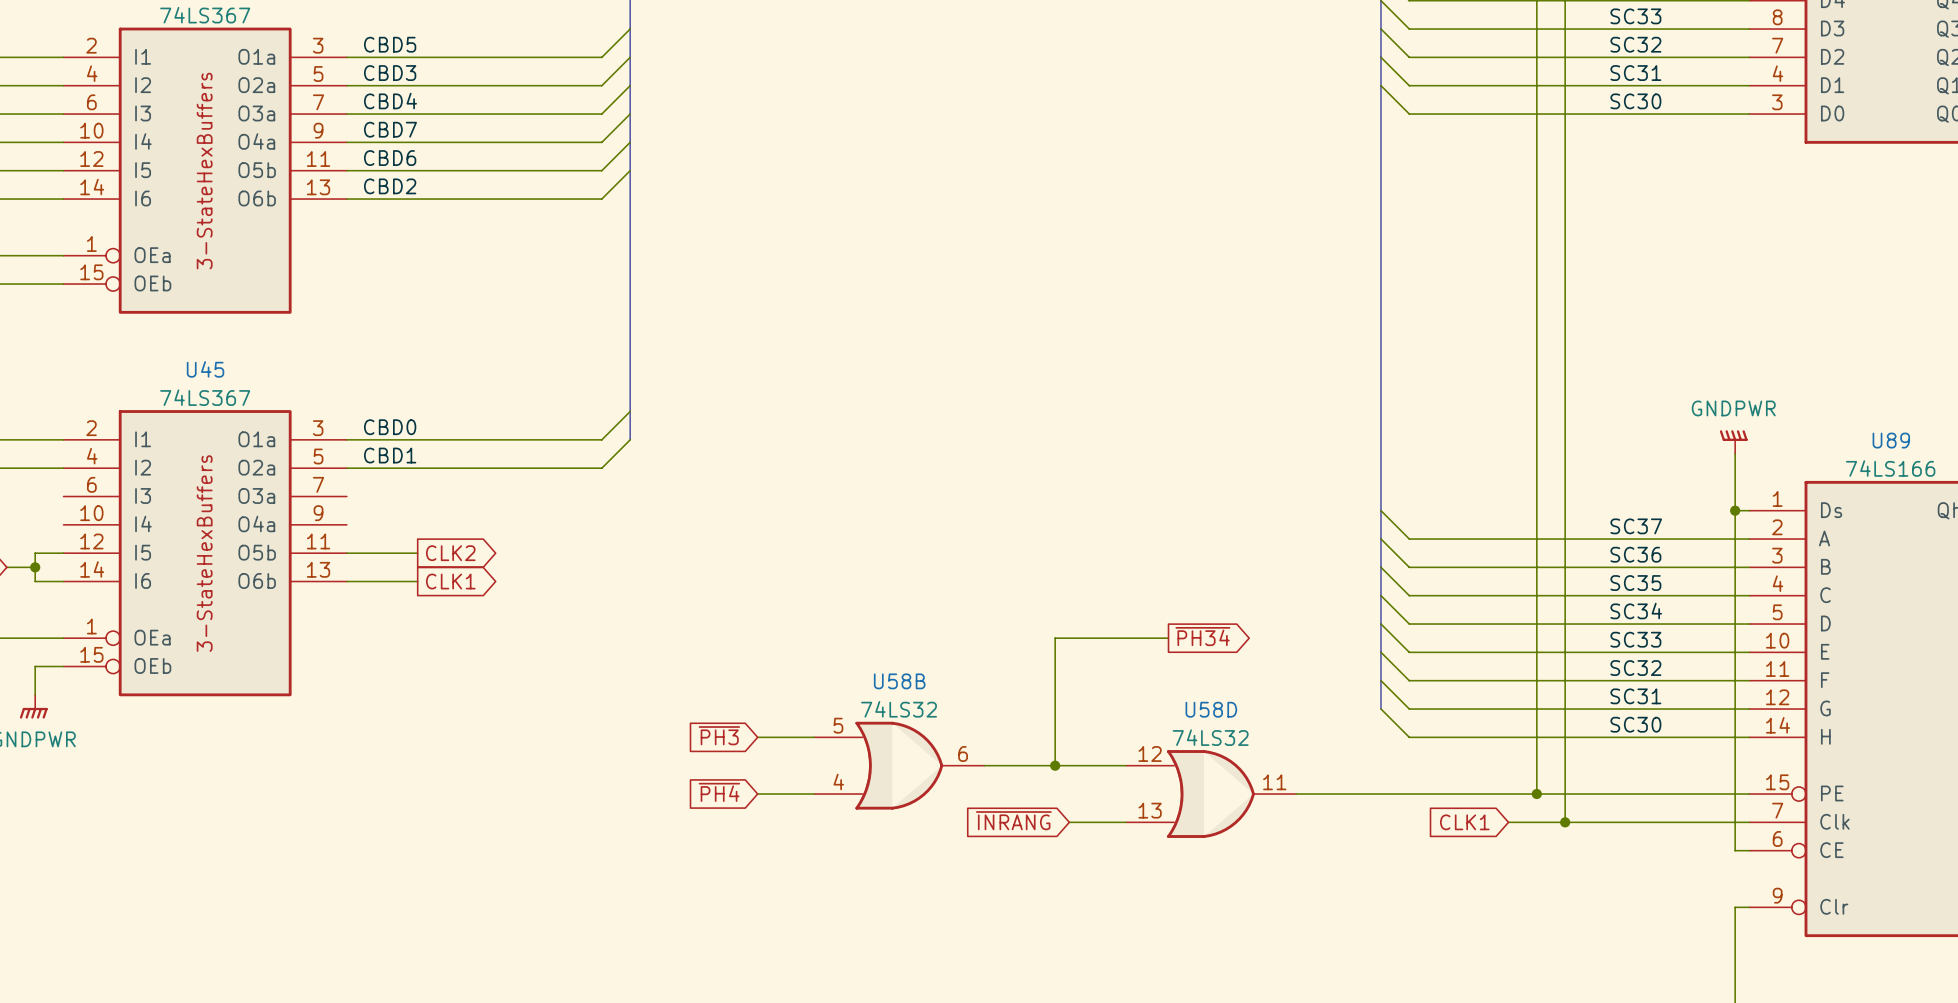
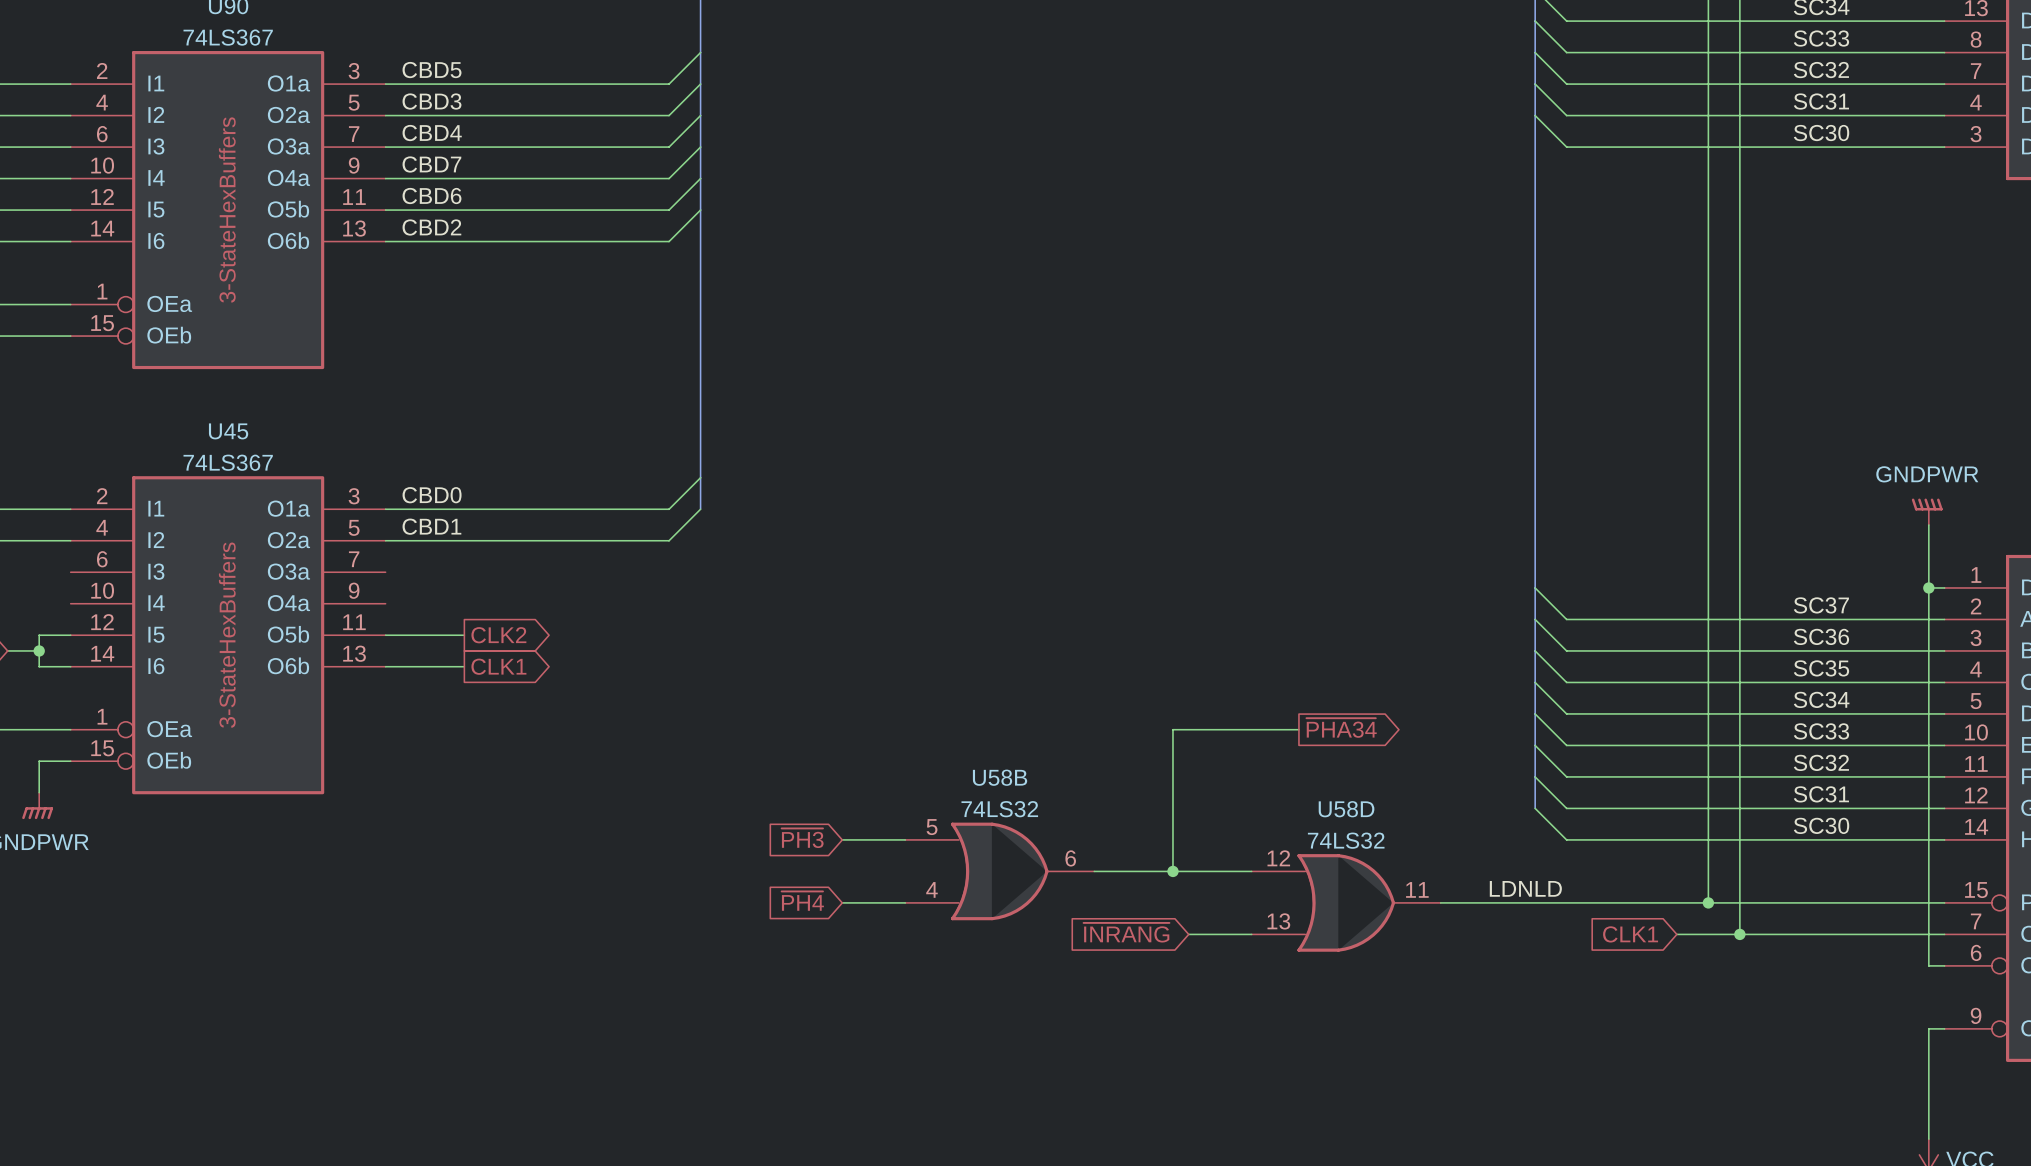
global label: ~{PH34} (1202, 636) -> ~{PHA34} (1341, 728)
label: none -> LDNLD (1525, 888)

